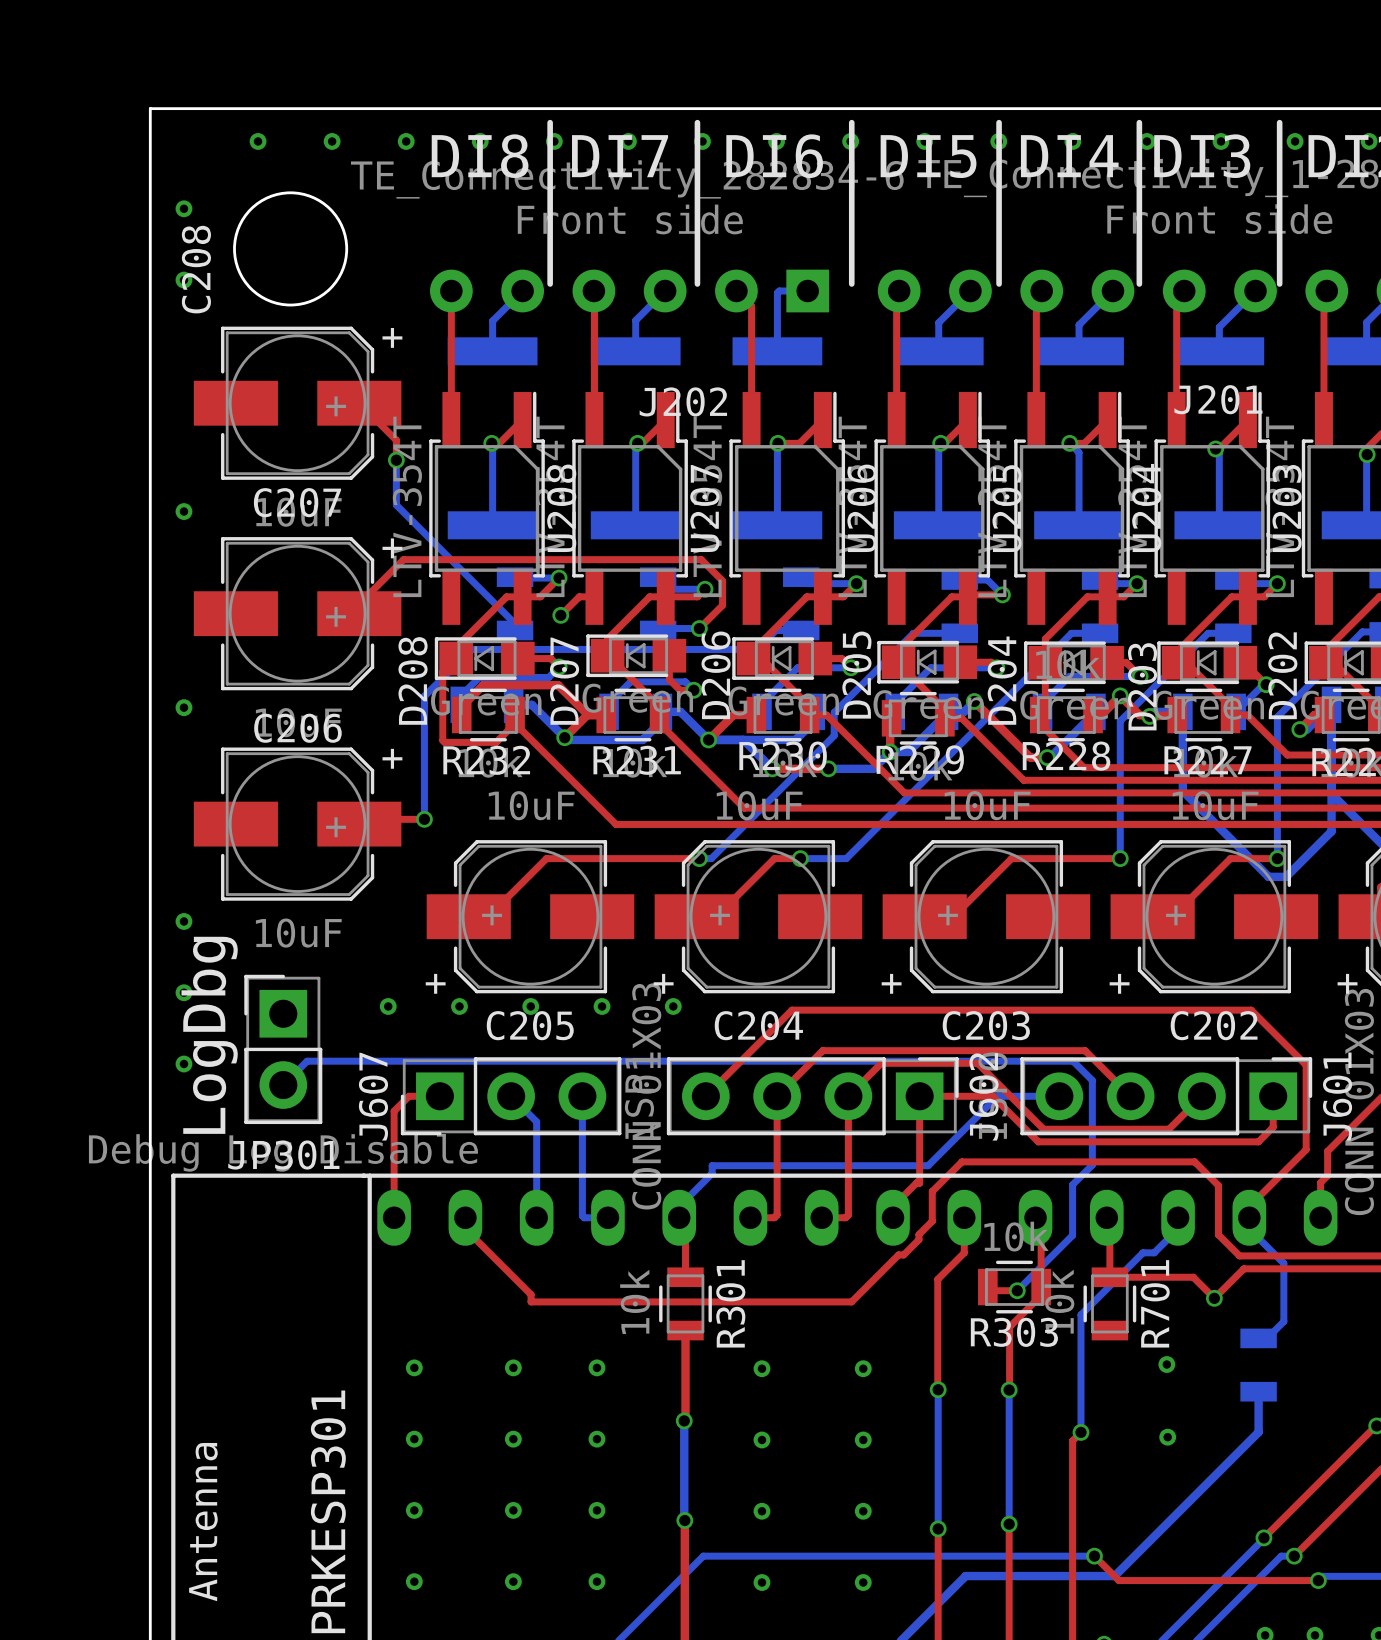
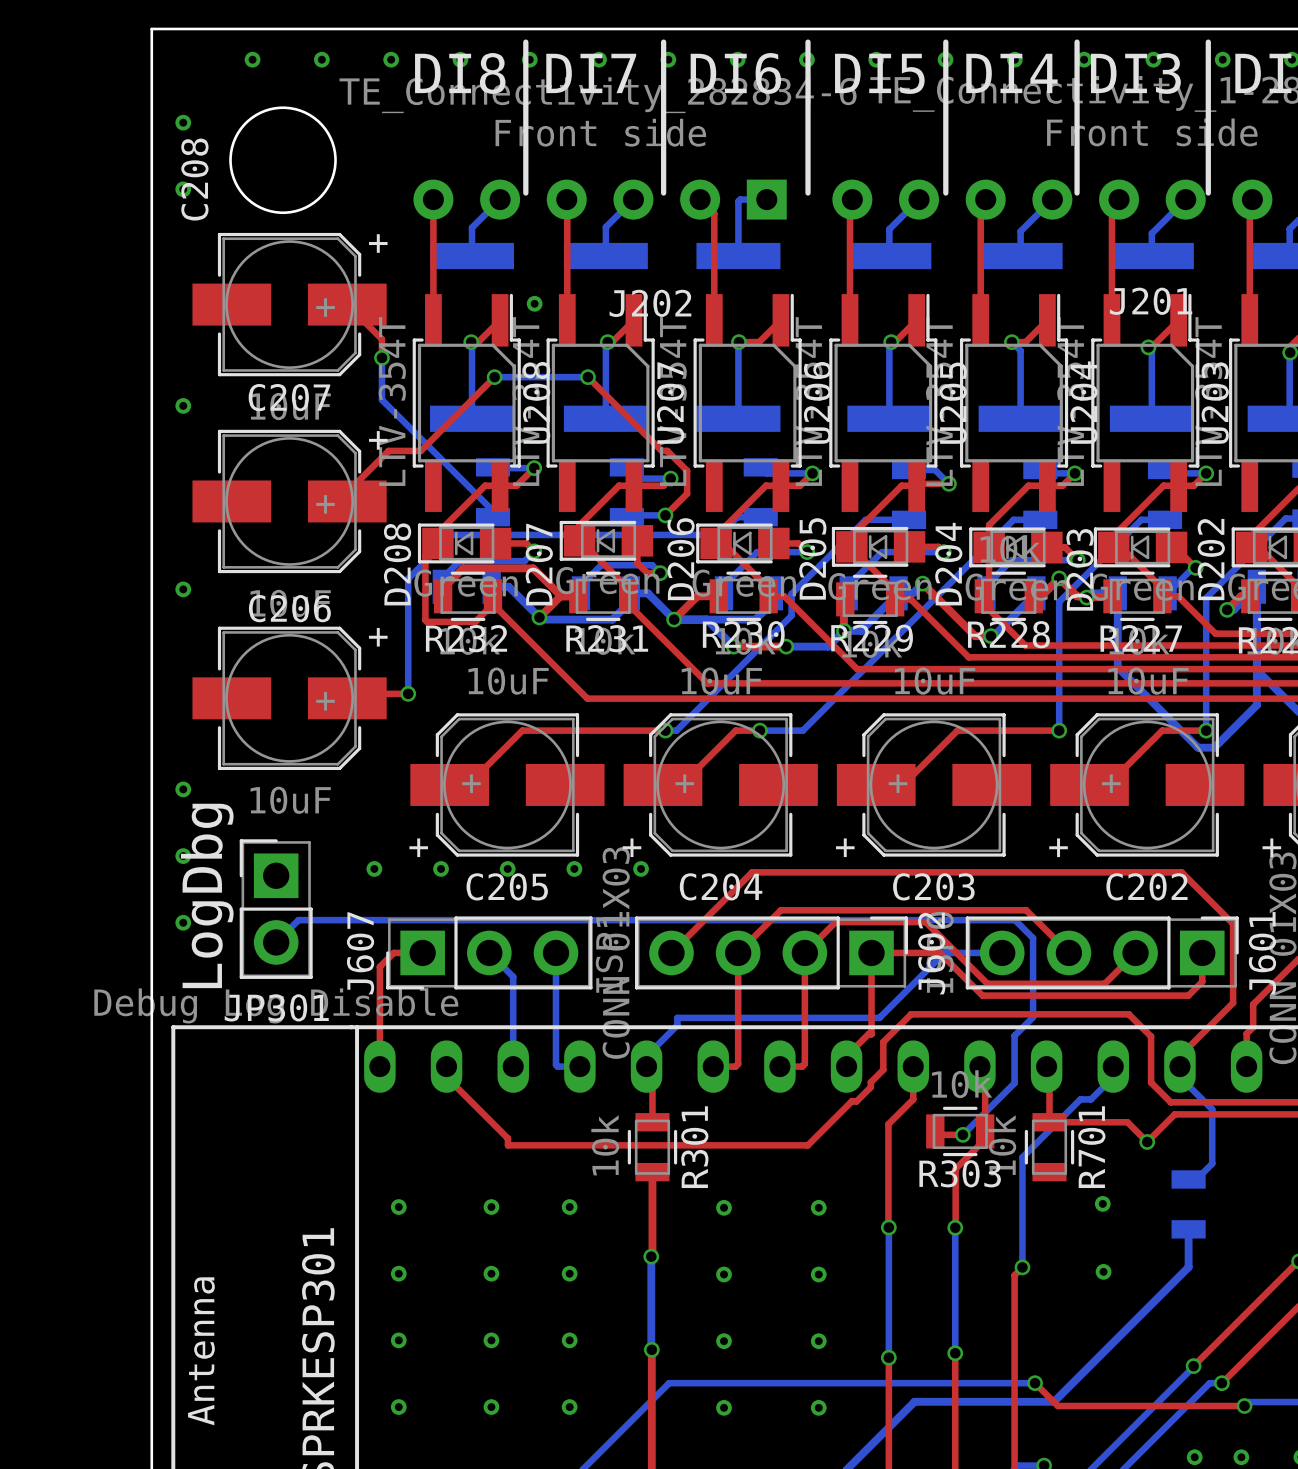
part: none -> (534, 303)
bottom track: none -> (494, 377) (587, 377)
via: none -> (494, 377)
top track: none -> (587, 377) (661, 450)
via: none -> (587, 377)
top track: (437, 559) (695, 559) -> (420, 450) (494, 377)
top track: (594, 596) (579, 596) (560, 615) -> none
via: (560, 615) -> none

